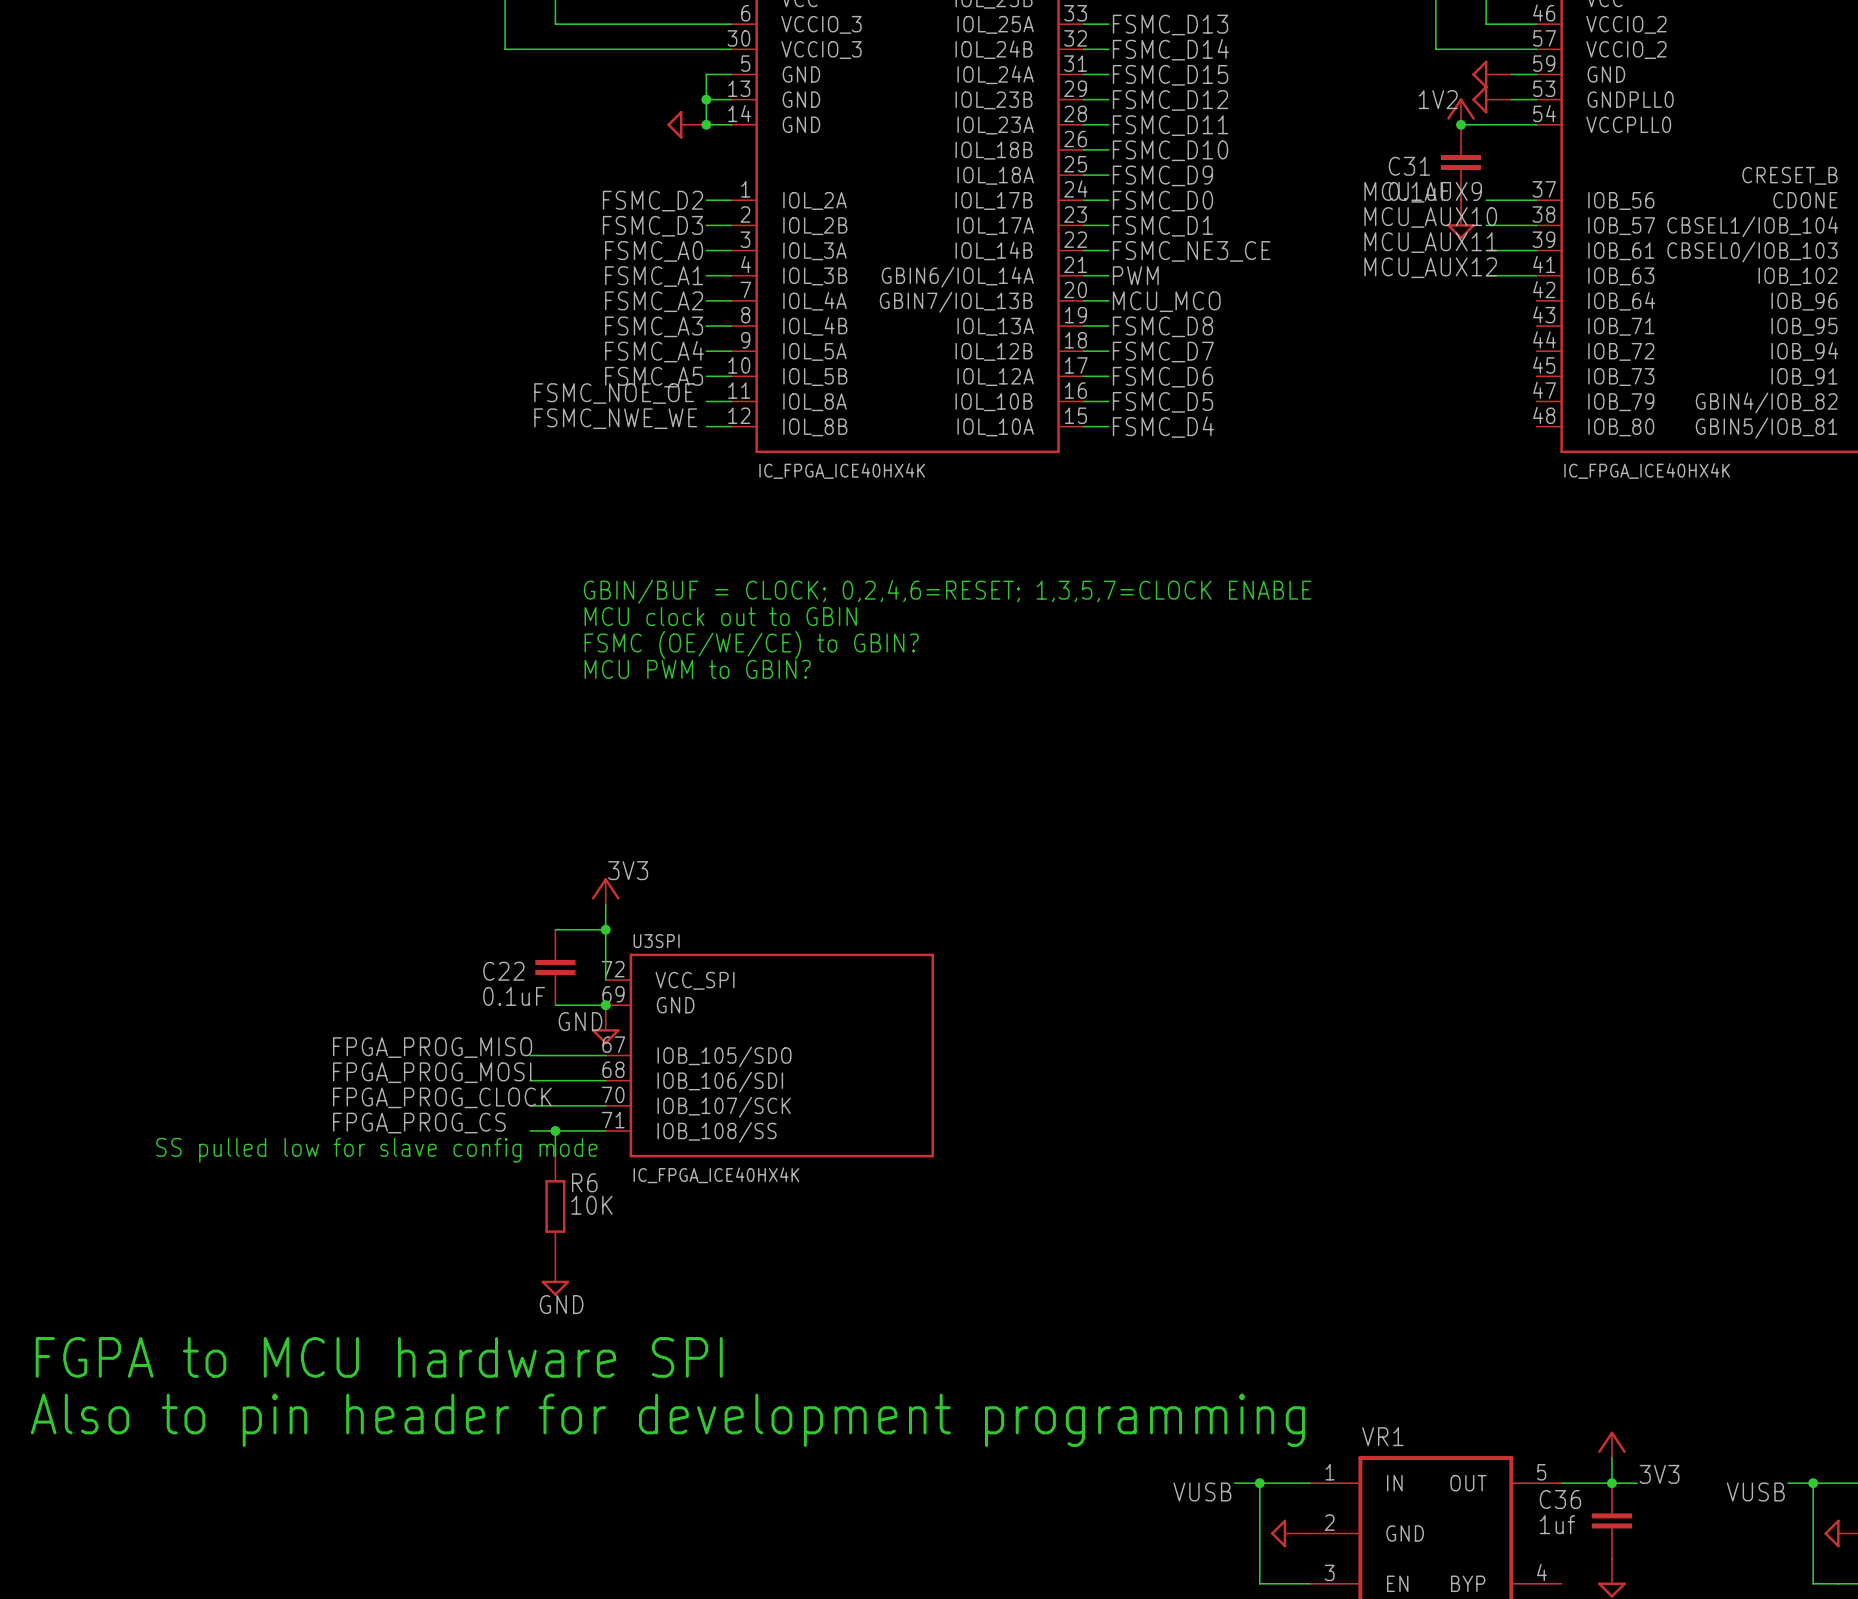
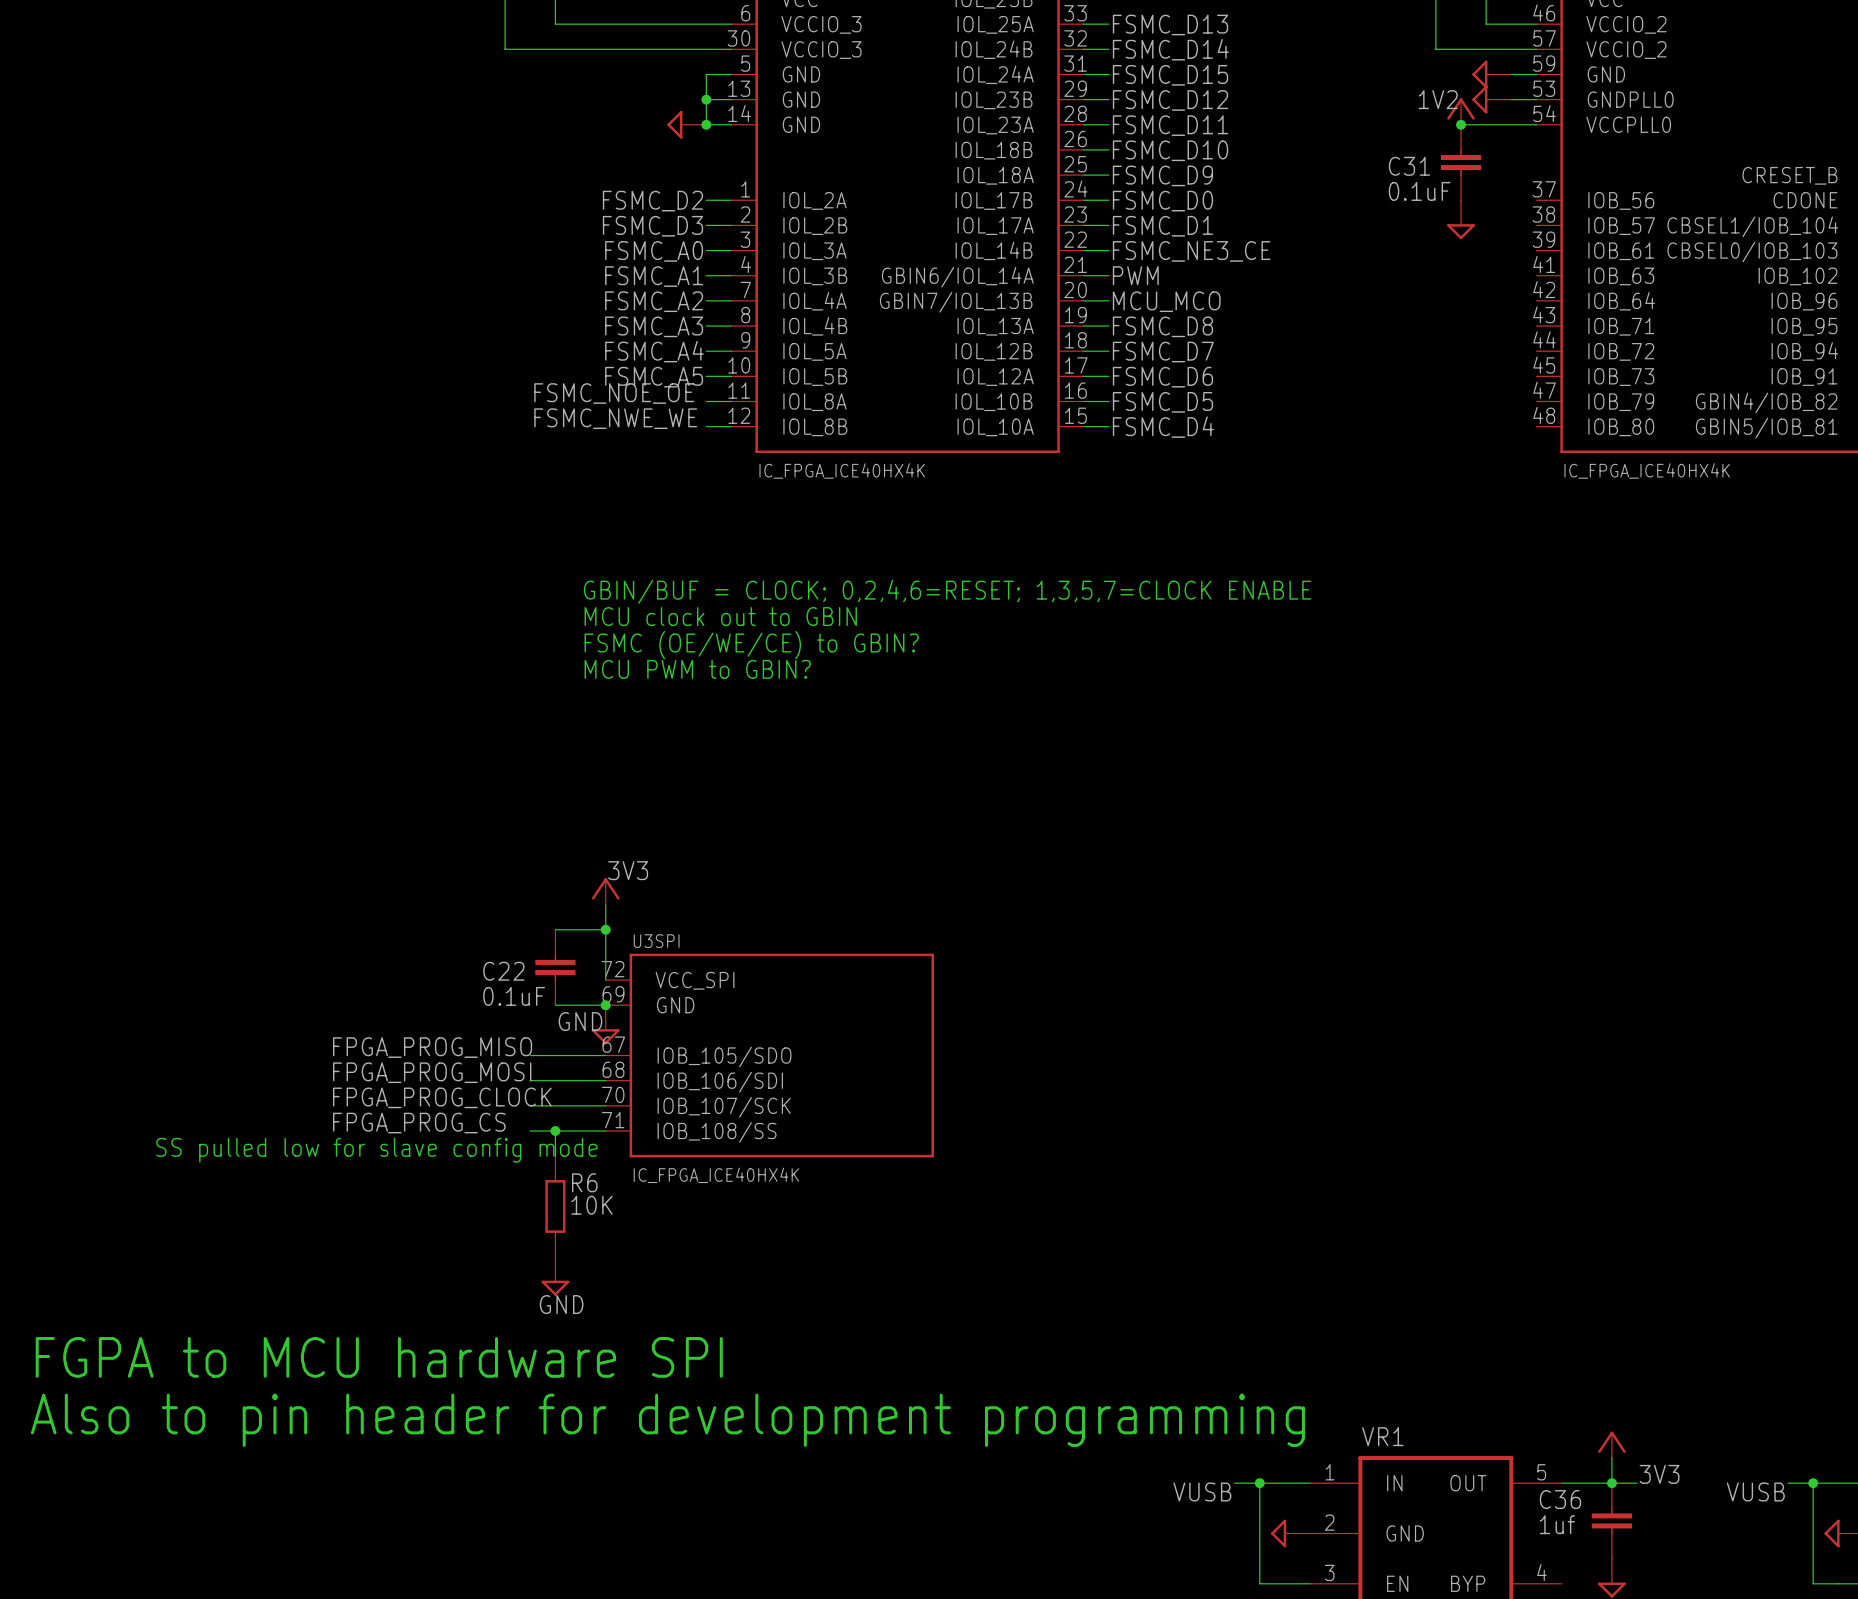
label: MCU_AUX9 (1423, 192) -> none
wire: (1486, 200) (1536, 200) -> none
label: MCU_AUX10 (1430, 217) -> none
wire: (1486, 225) (1536, 225) -> none
label: MCU_AUX11 (1430, 242) -> none
wire: (1486, 250) (1536, 250) -> none
label: MCU_AUX12 (1430, 267) -> none
wire: (1486, 275) (1536, 275) -> none

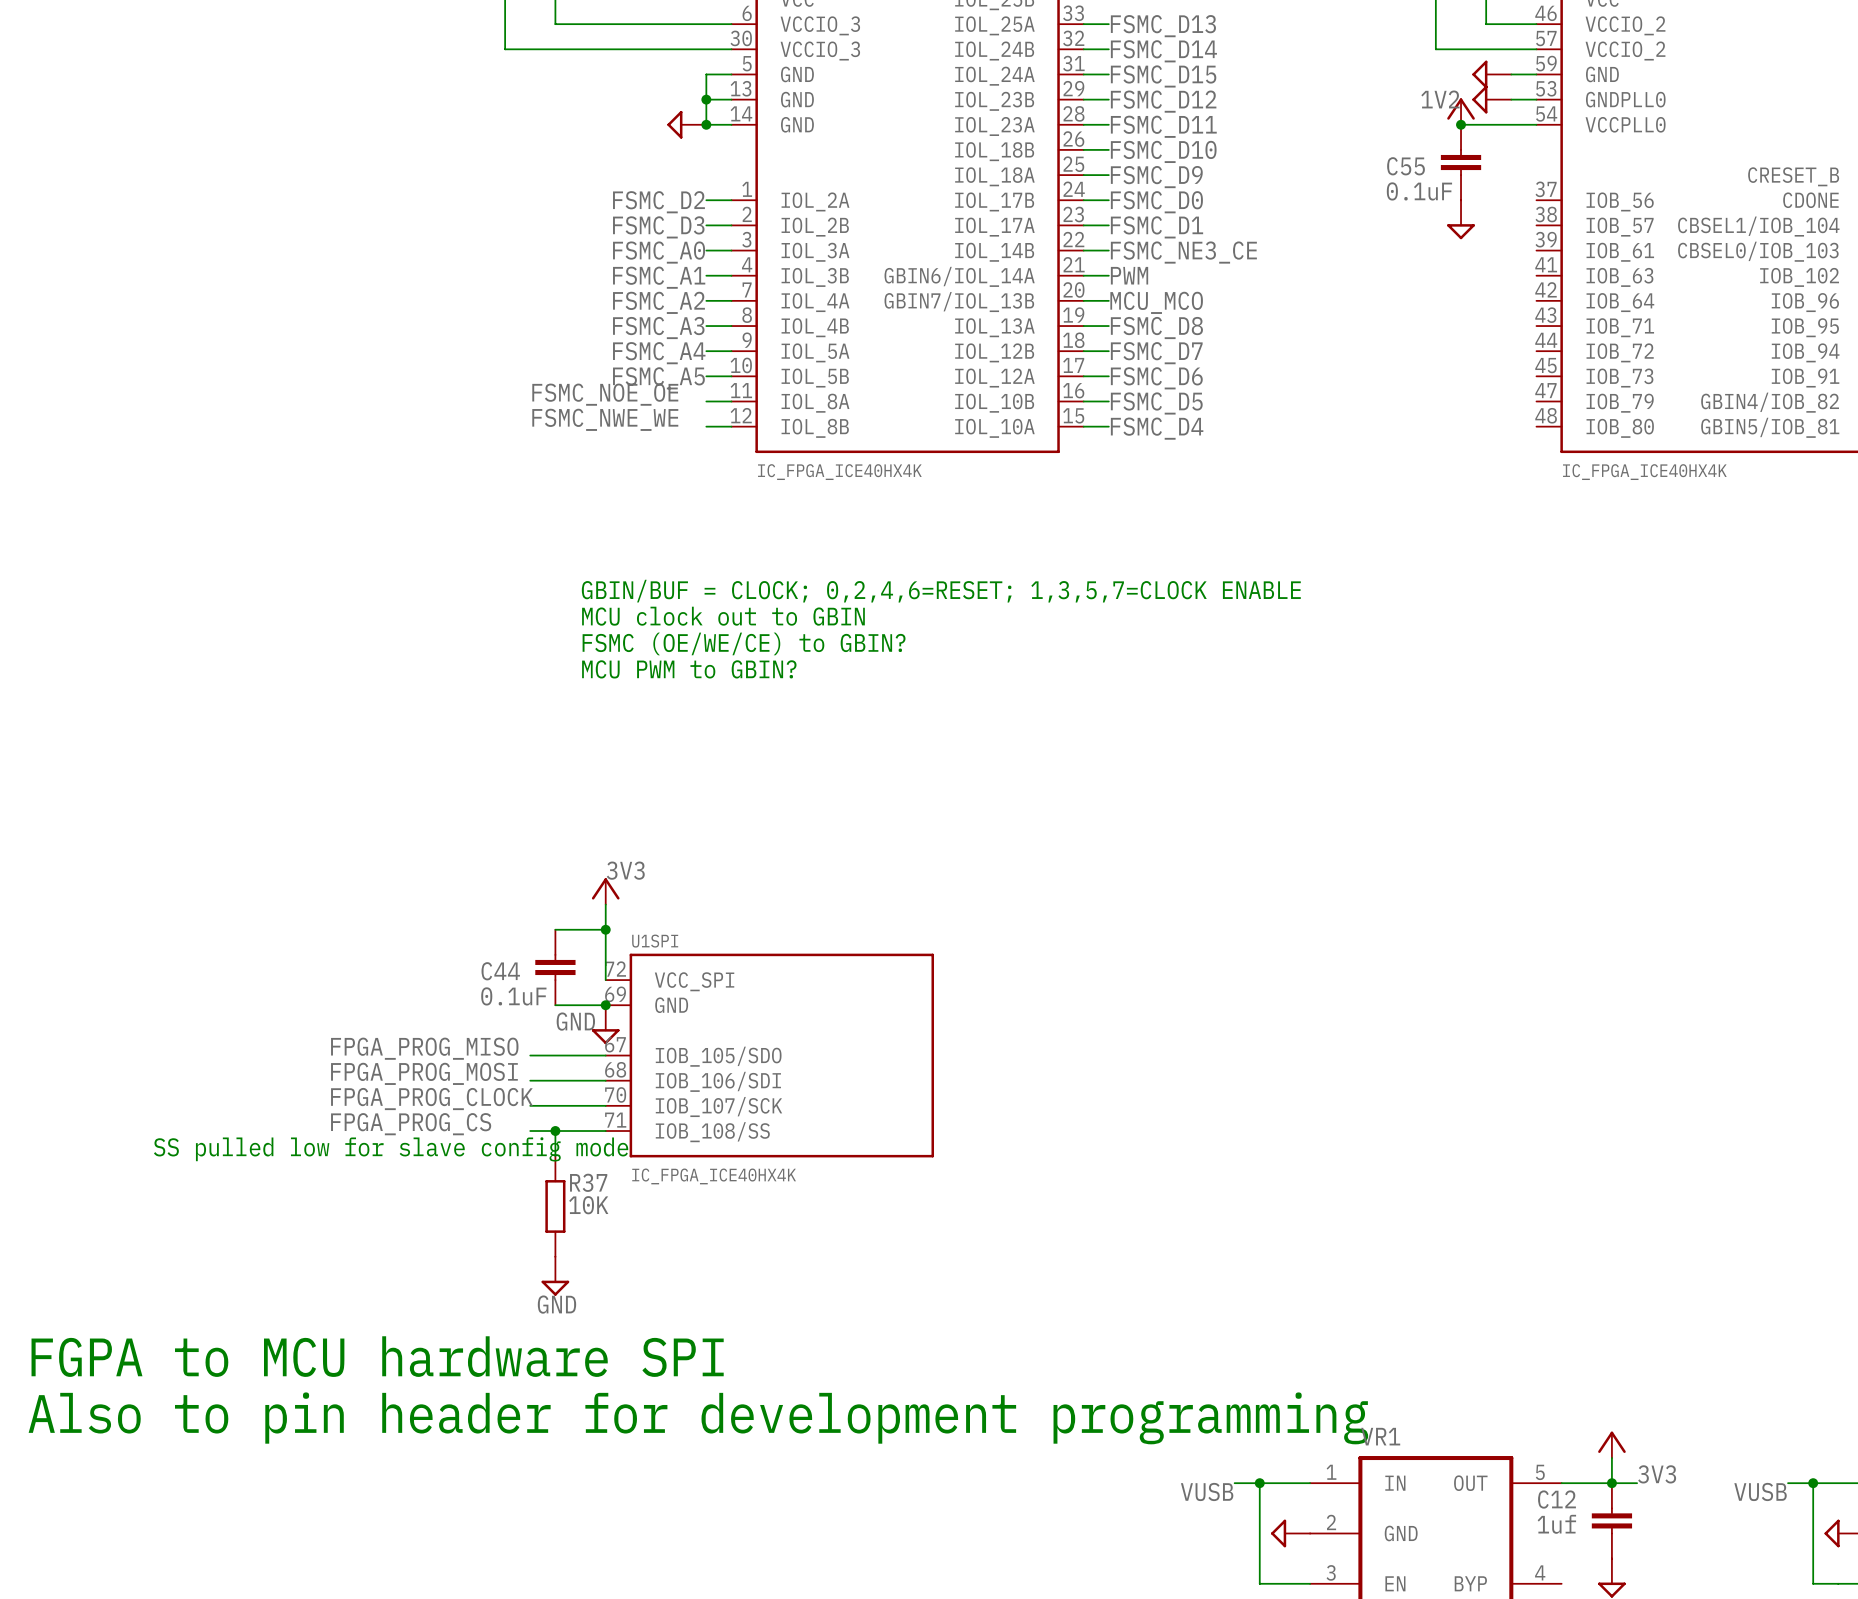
C31 name: C31 (1409, 166) -> C55 (1406, 166)
U3SPI name: U3SPI (656, 941) -> U1SPI (655, 941)
C22 name: C22 (503, 971) -> C44 (500, 971)
R6 name: R6 (584, 1182) -> R37 (588, 1182)
C36 name: C36 (1560, 1499) -> C12 (1556, 1499)

